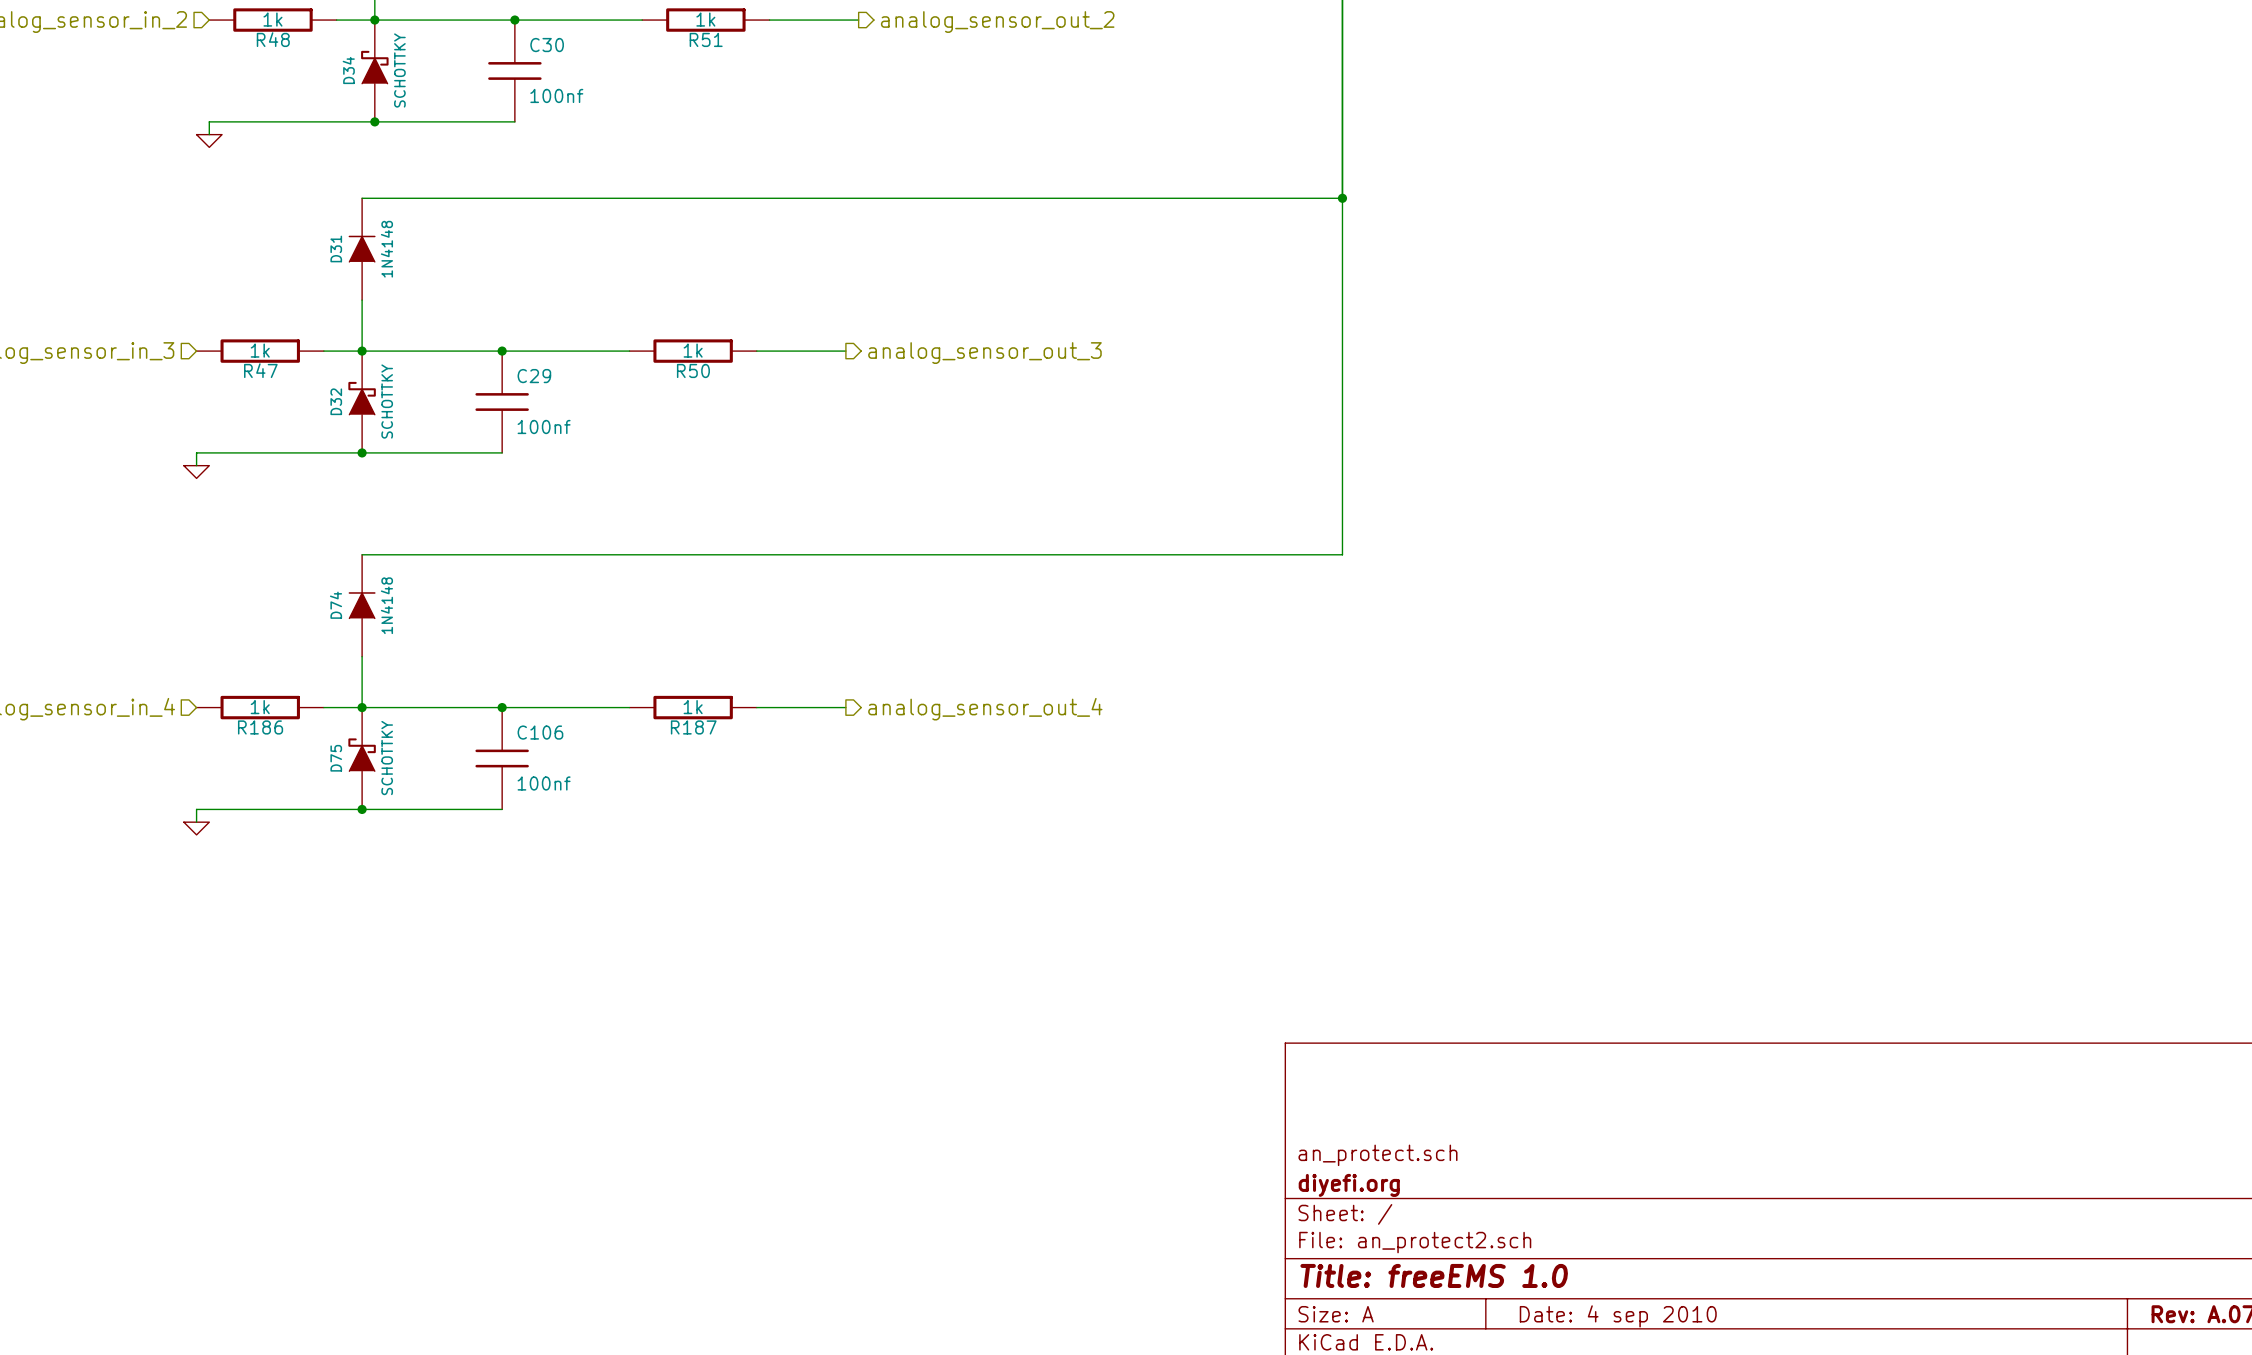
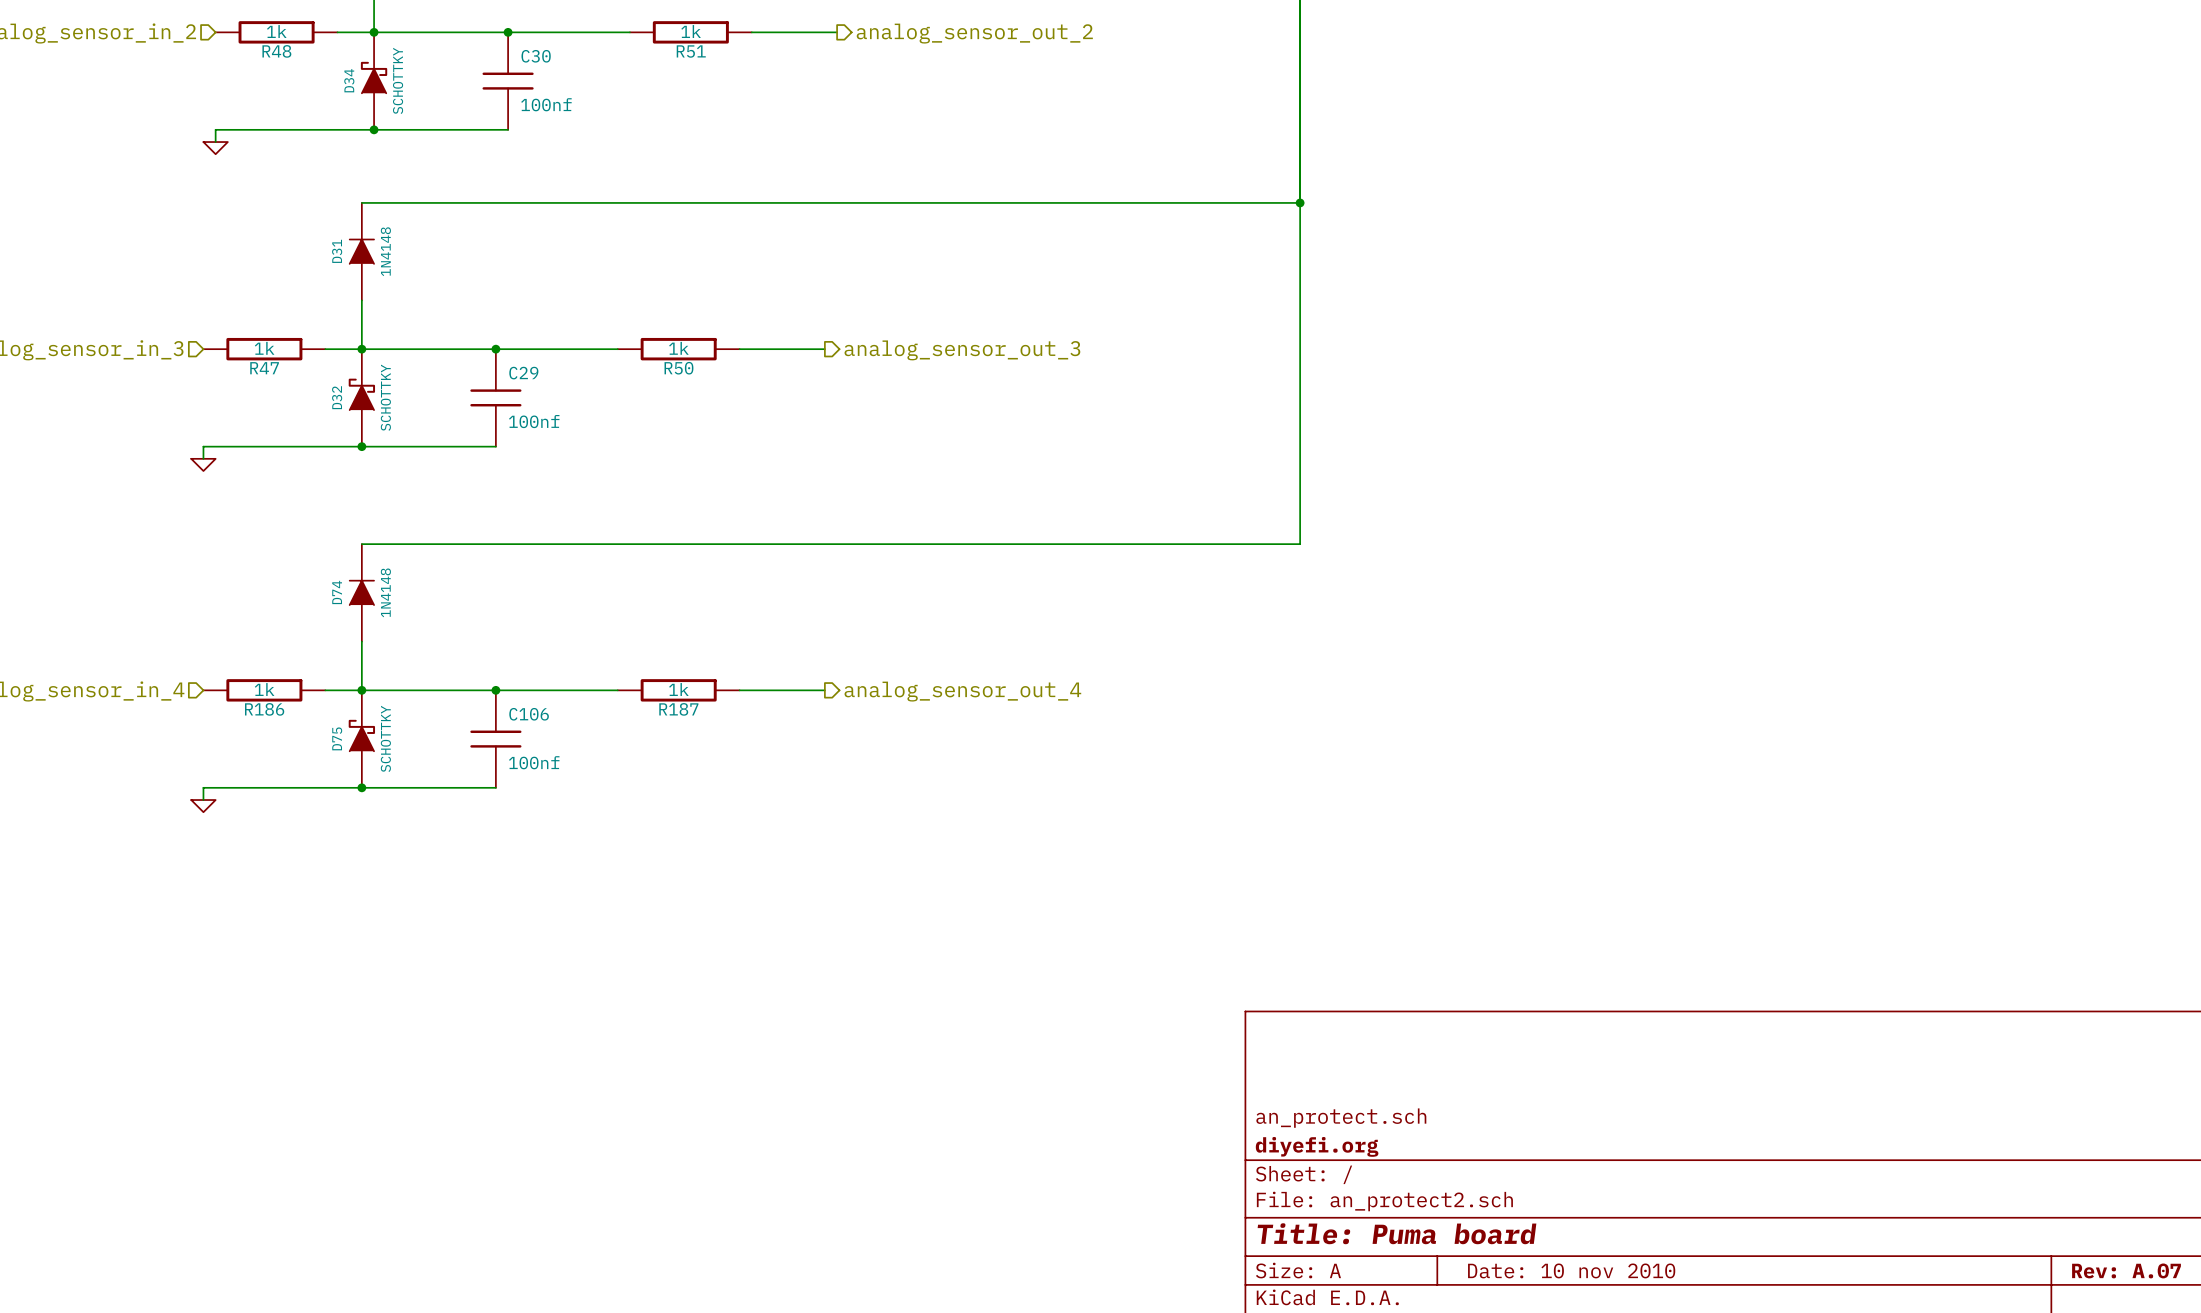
title block: Title: freeEMS 1.0 (1434, 1275) -> Title: Puma board (1397, 1233)
title block: Date: 4 sep 2010 (1618, 1316) -> Date: 10 nov 2010 (1571, 1270)

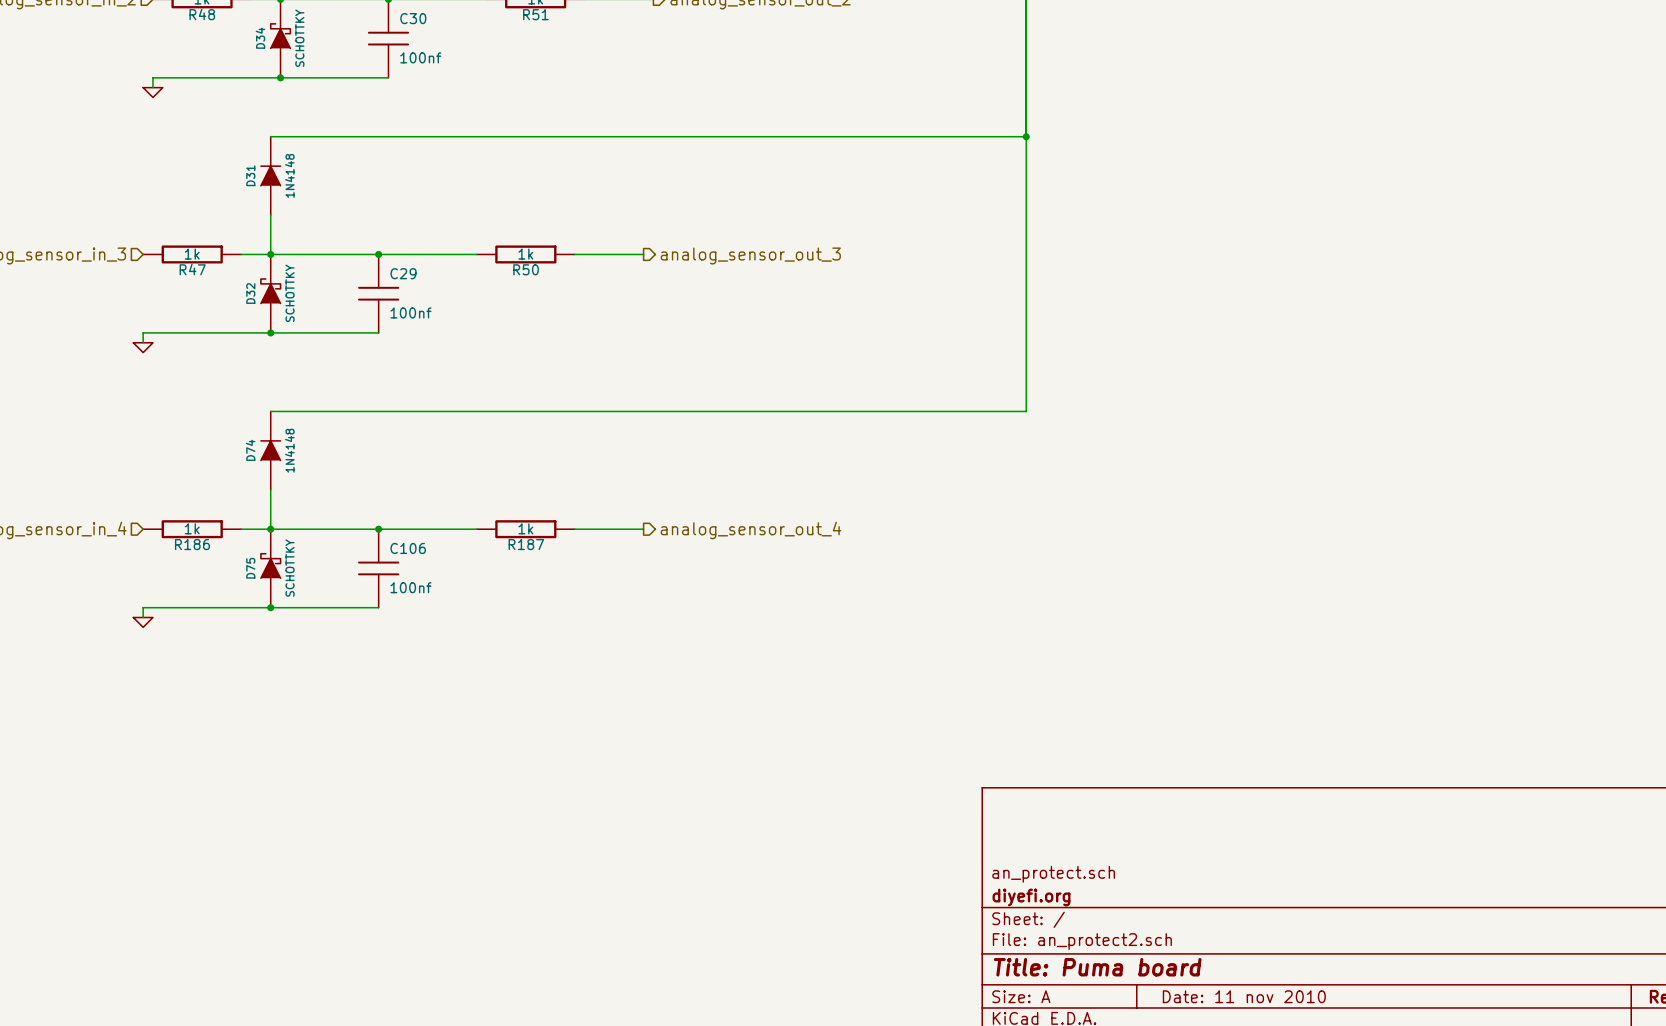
title block: Date: 10 nov 2010 (1571, 1270) -> Date: 11 nov 2010 (1244, 996)

